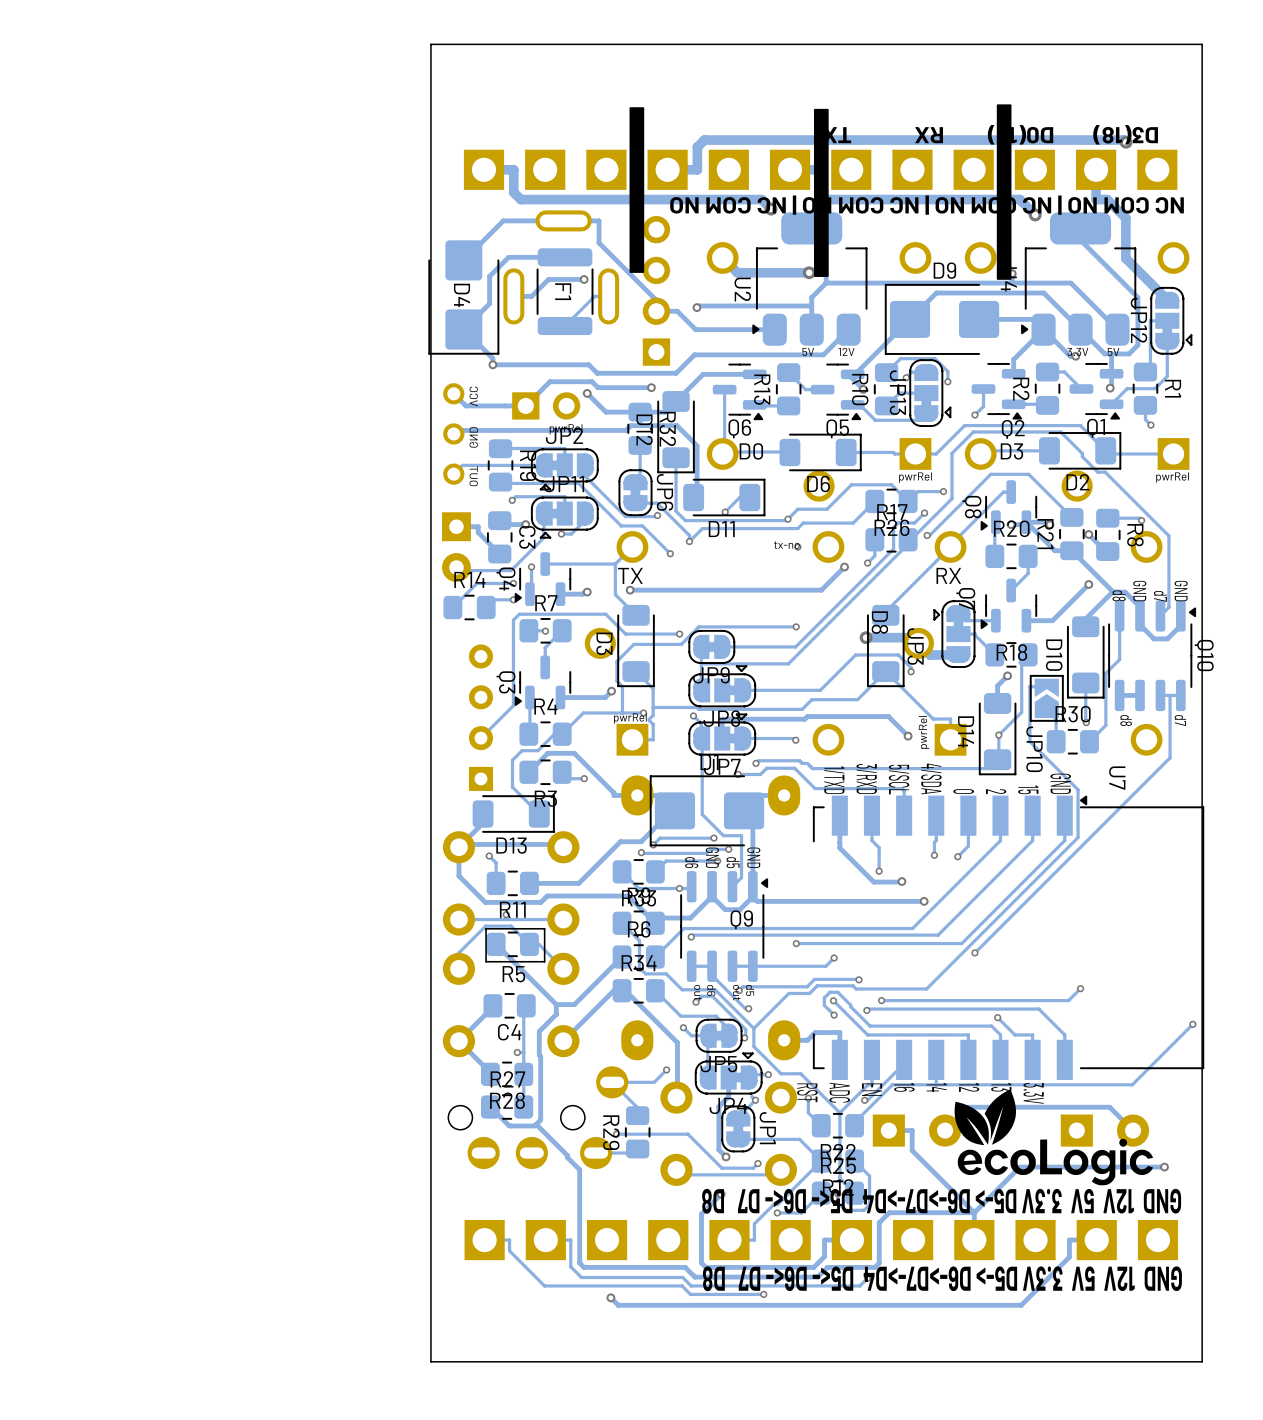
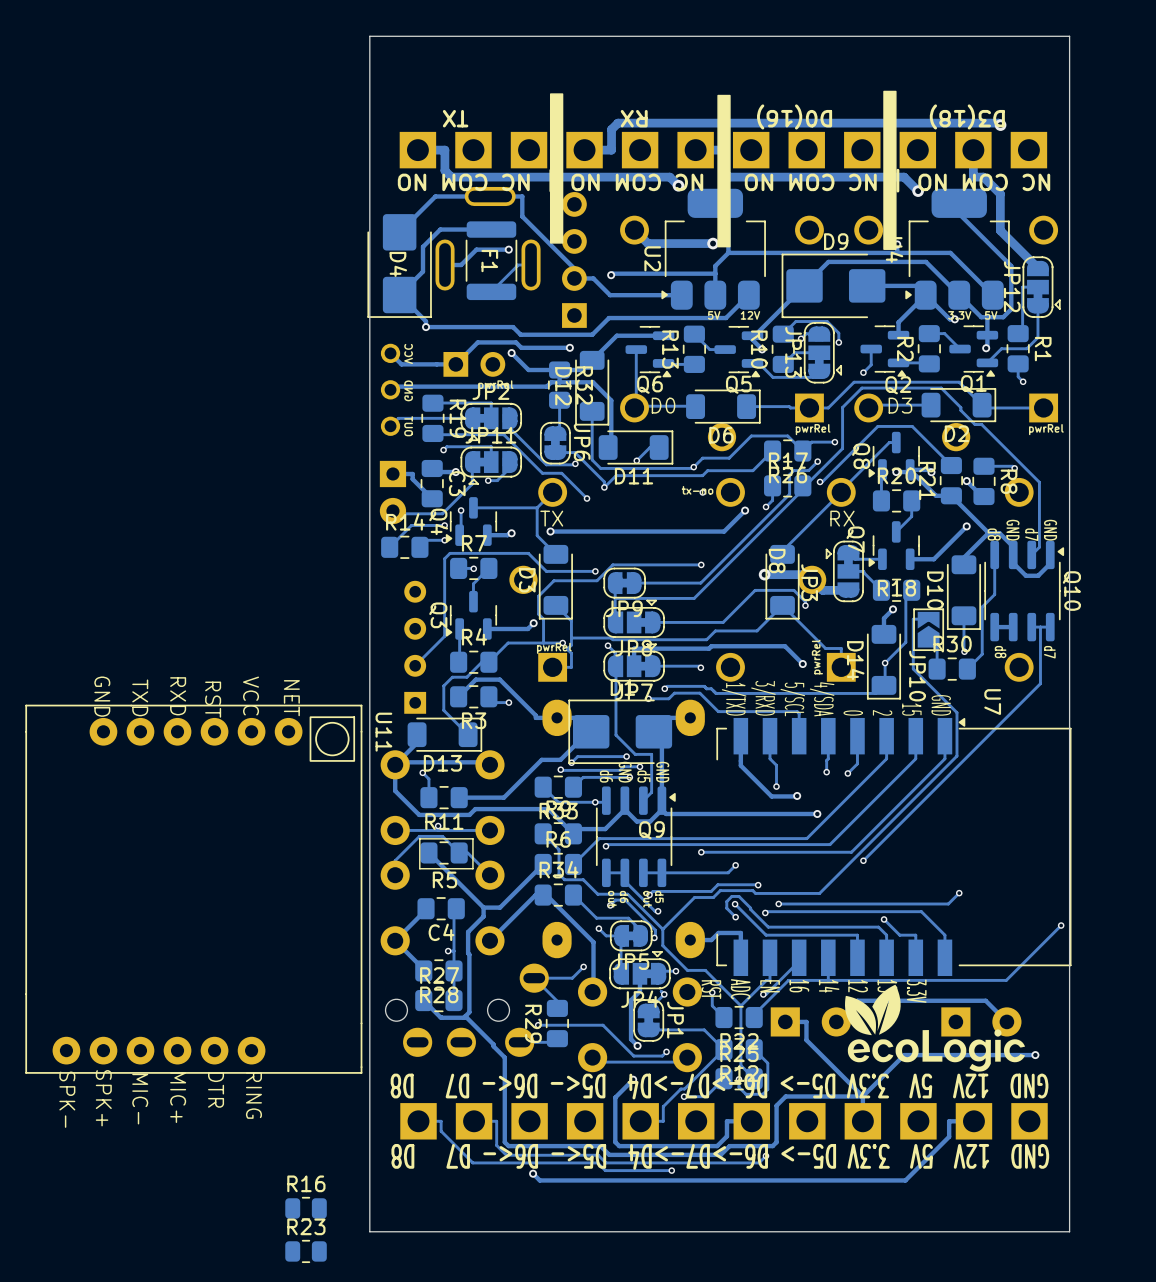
U11: none -> (193, 889)
R16: none -> (306, 1208)
R23: none -> (306, 1251)

